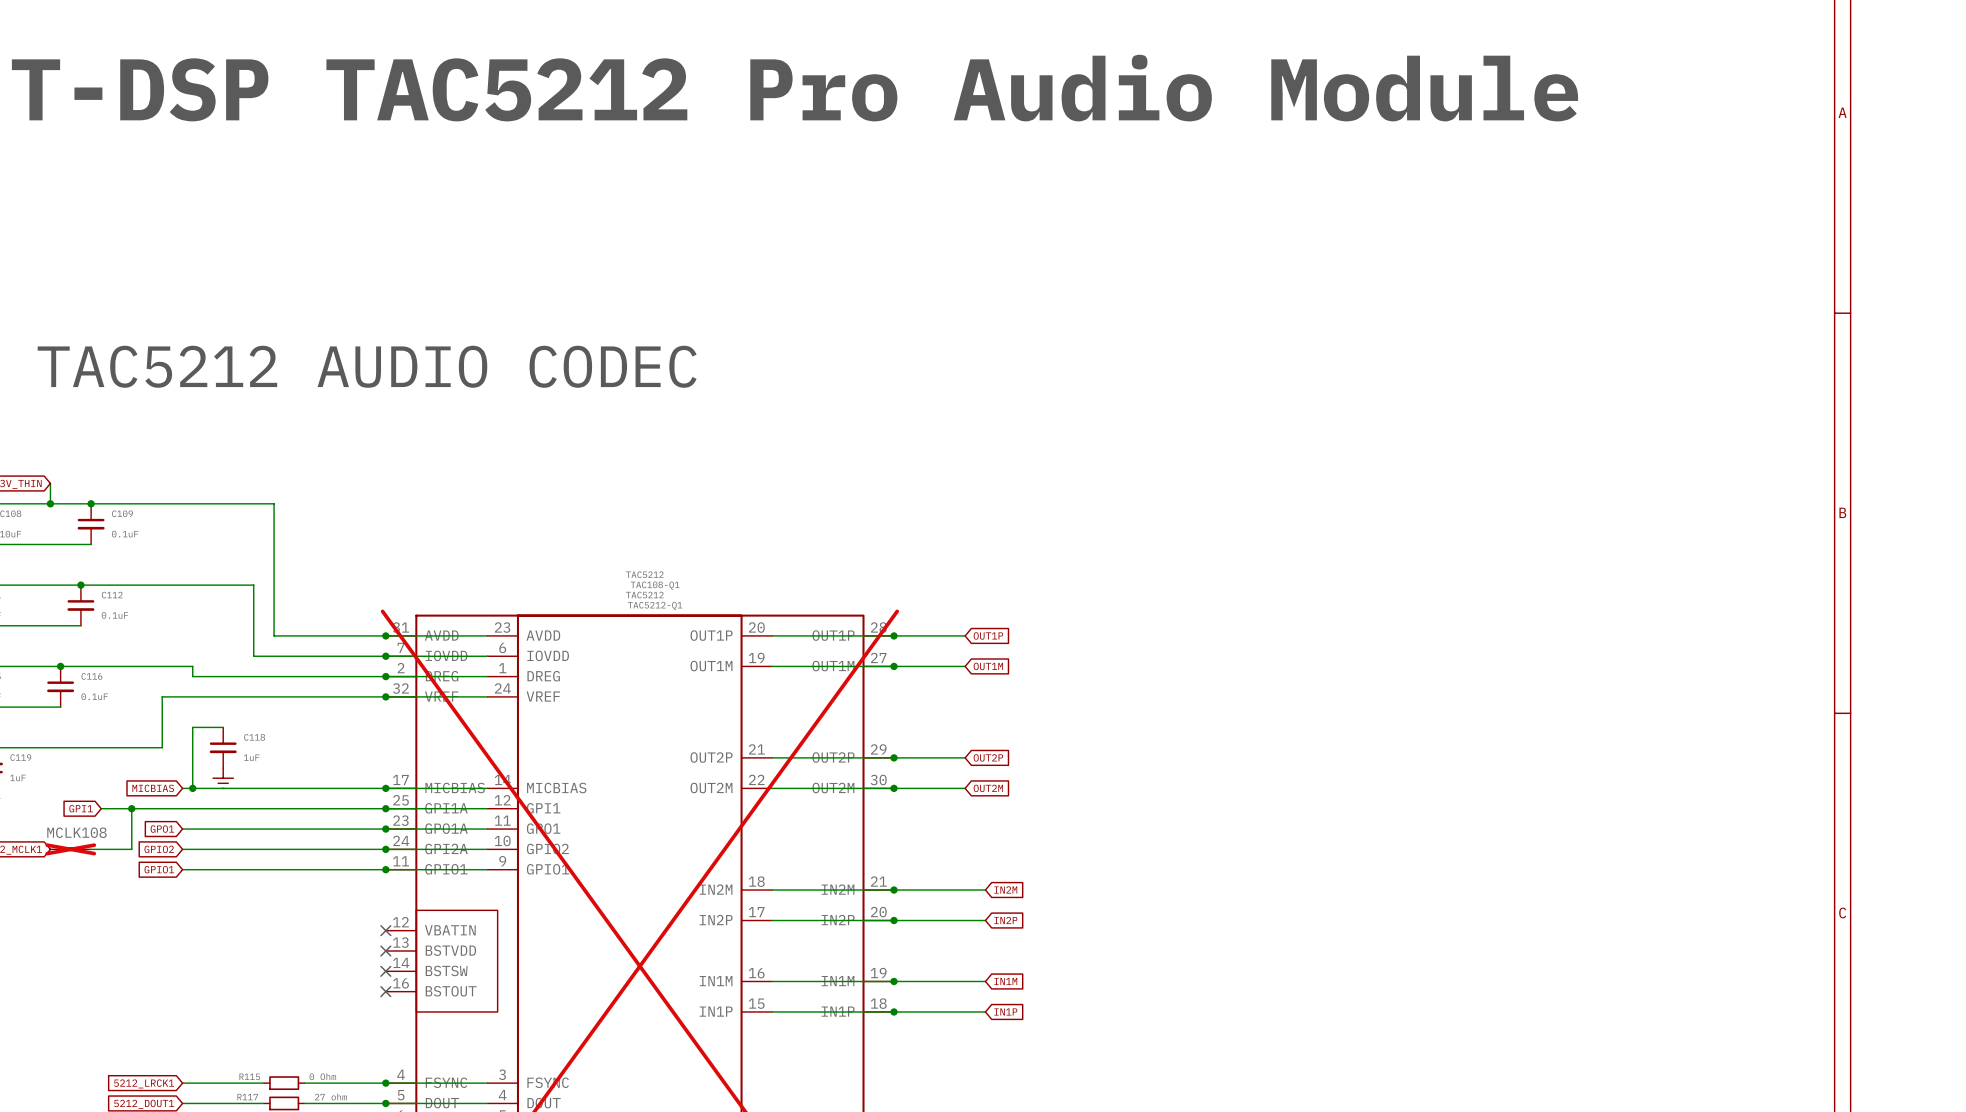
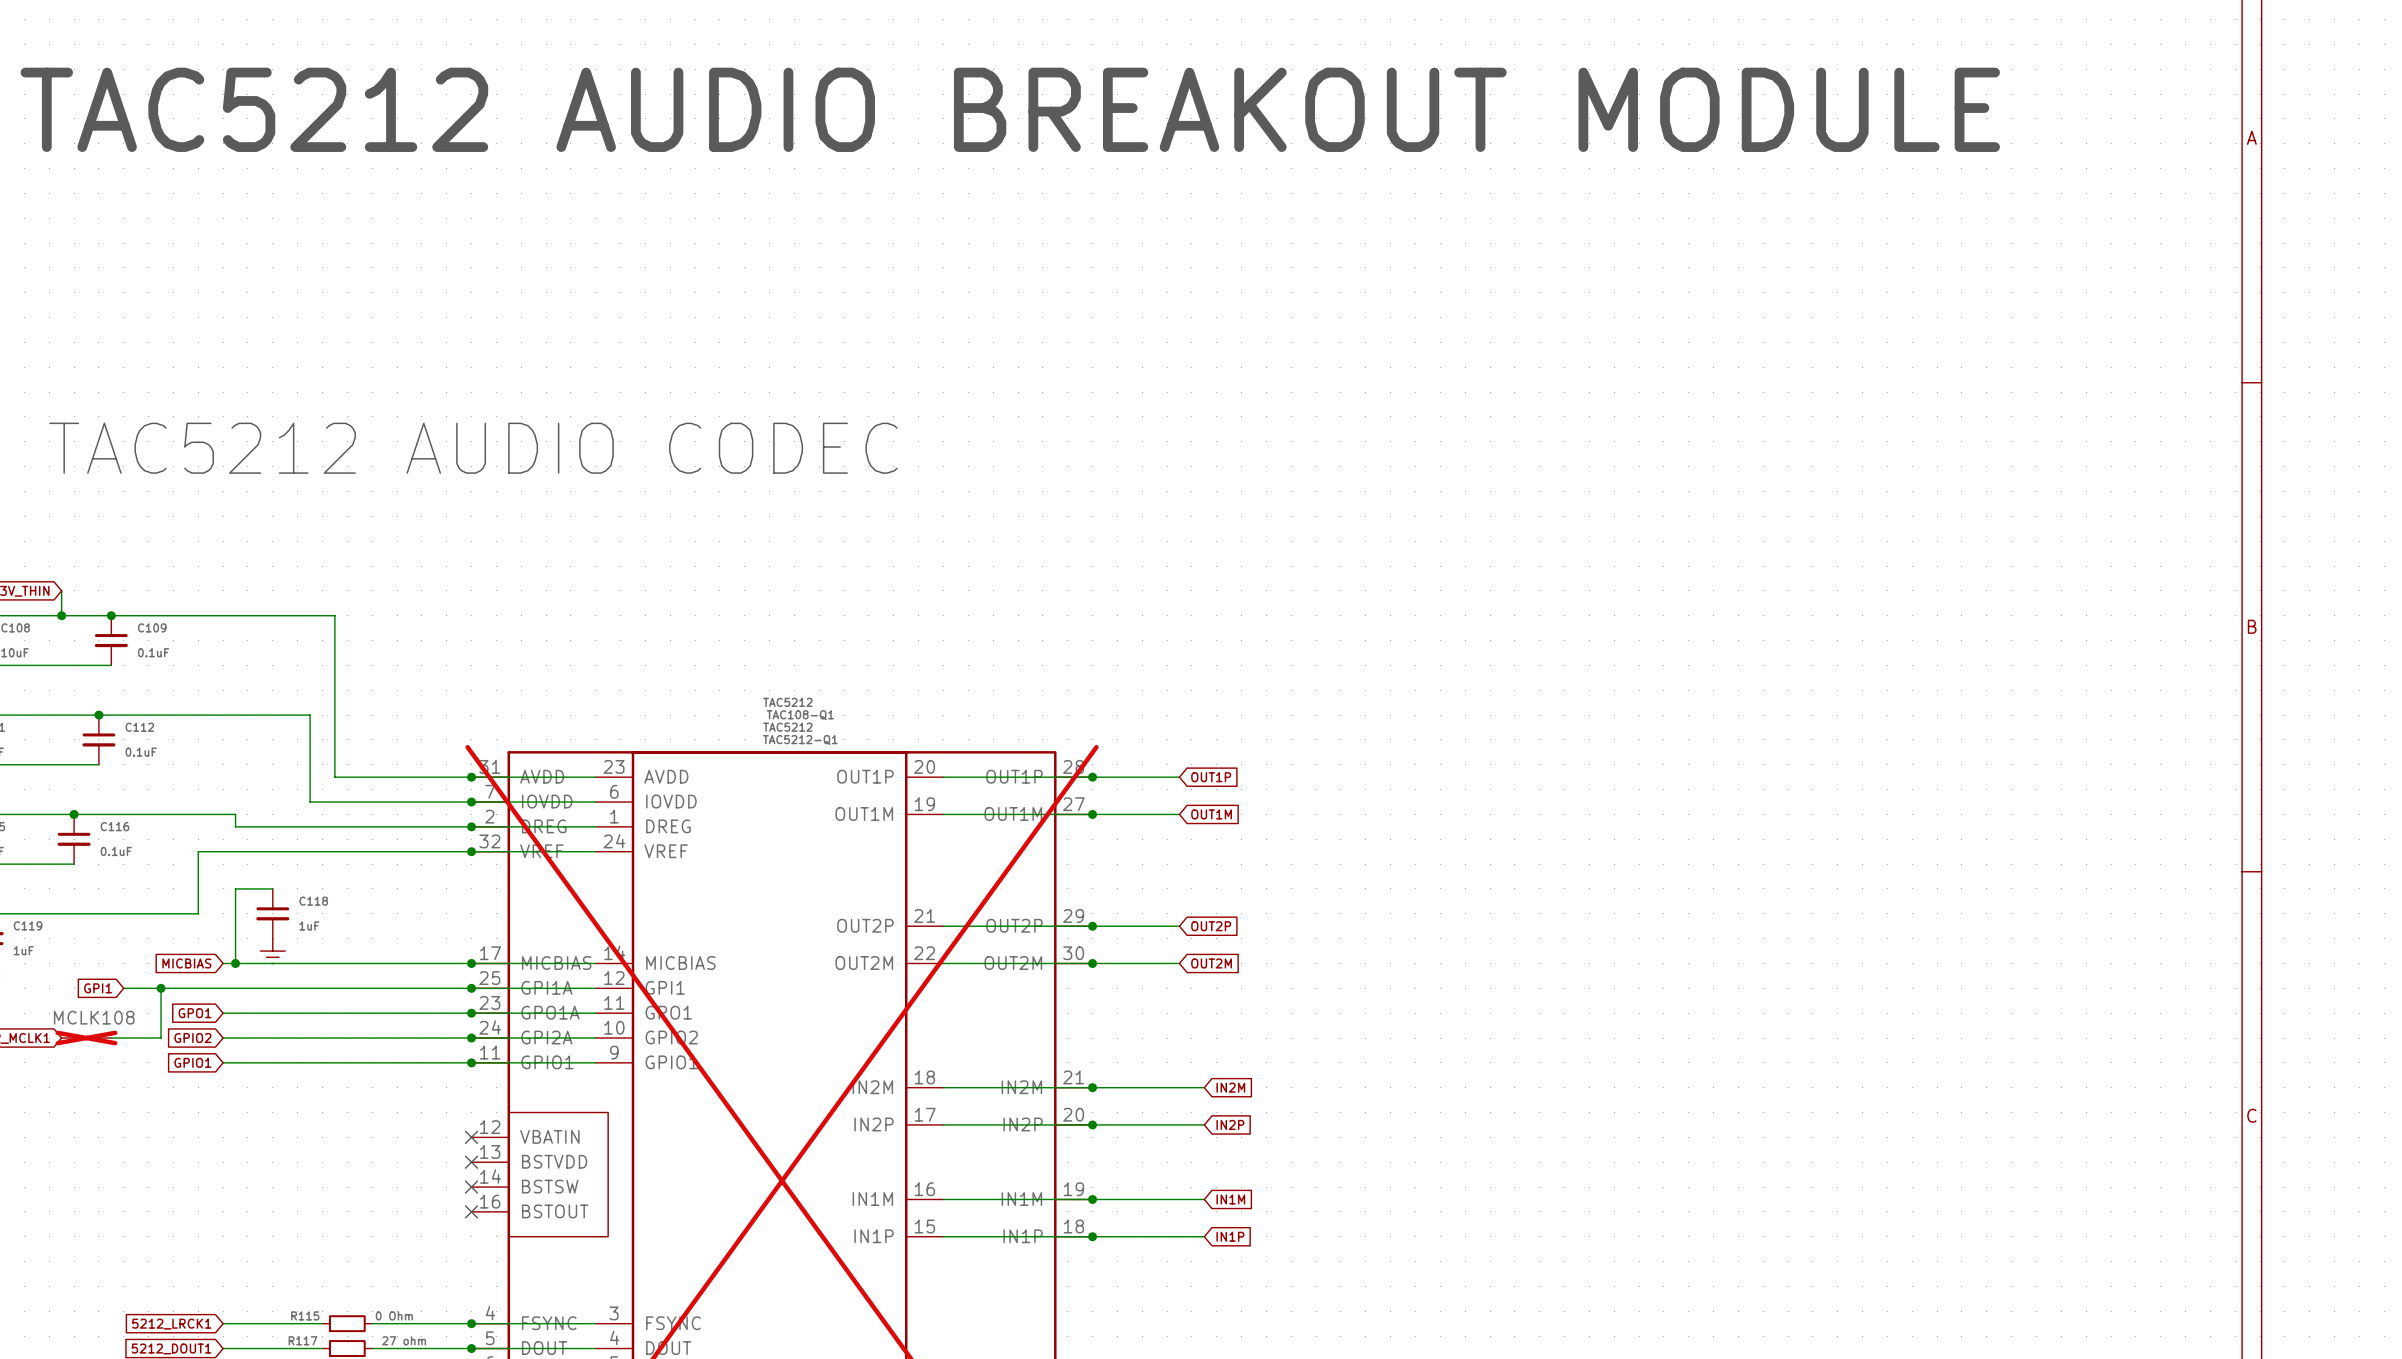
text: T-DSP TAC5212 Pro Audio Module (794, 88) -> TAC5212 AUDIO BREAKOUT MODULE (1010, 109)

